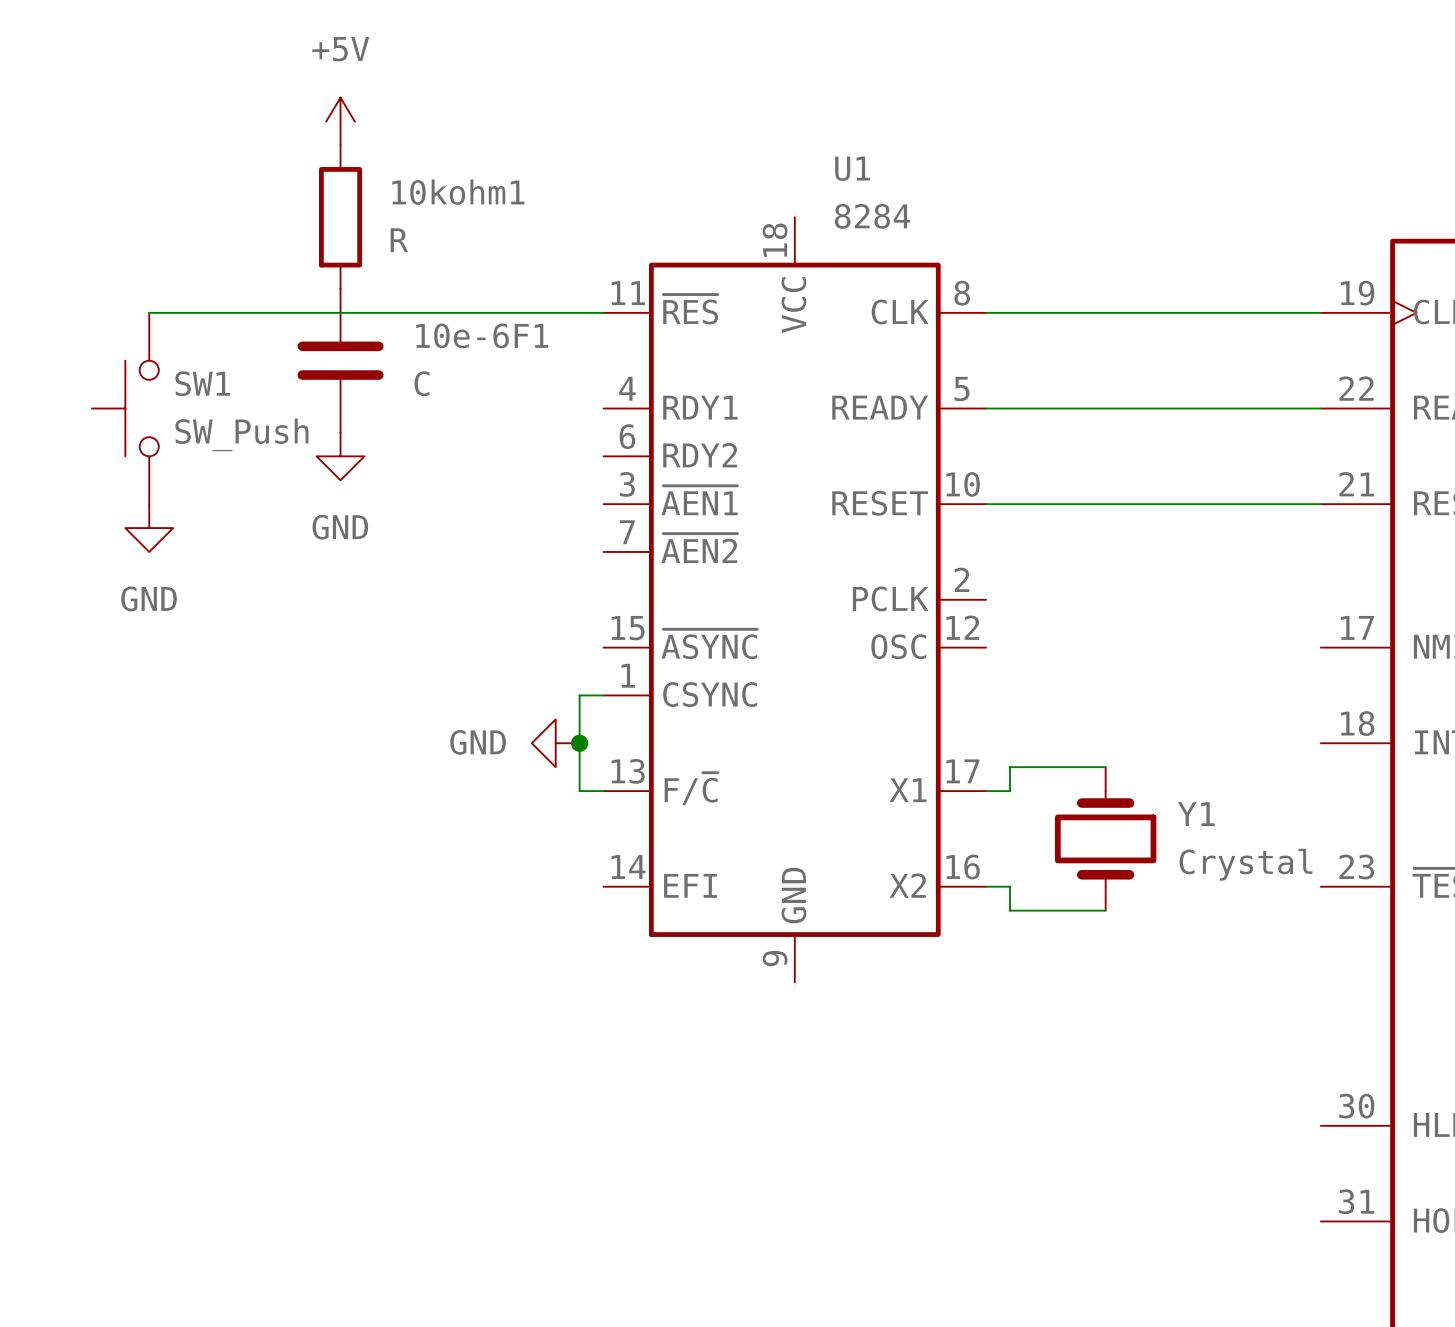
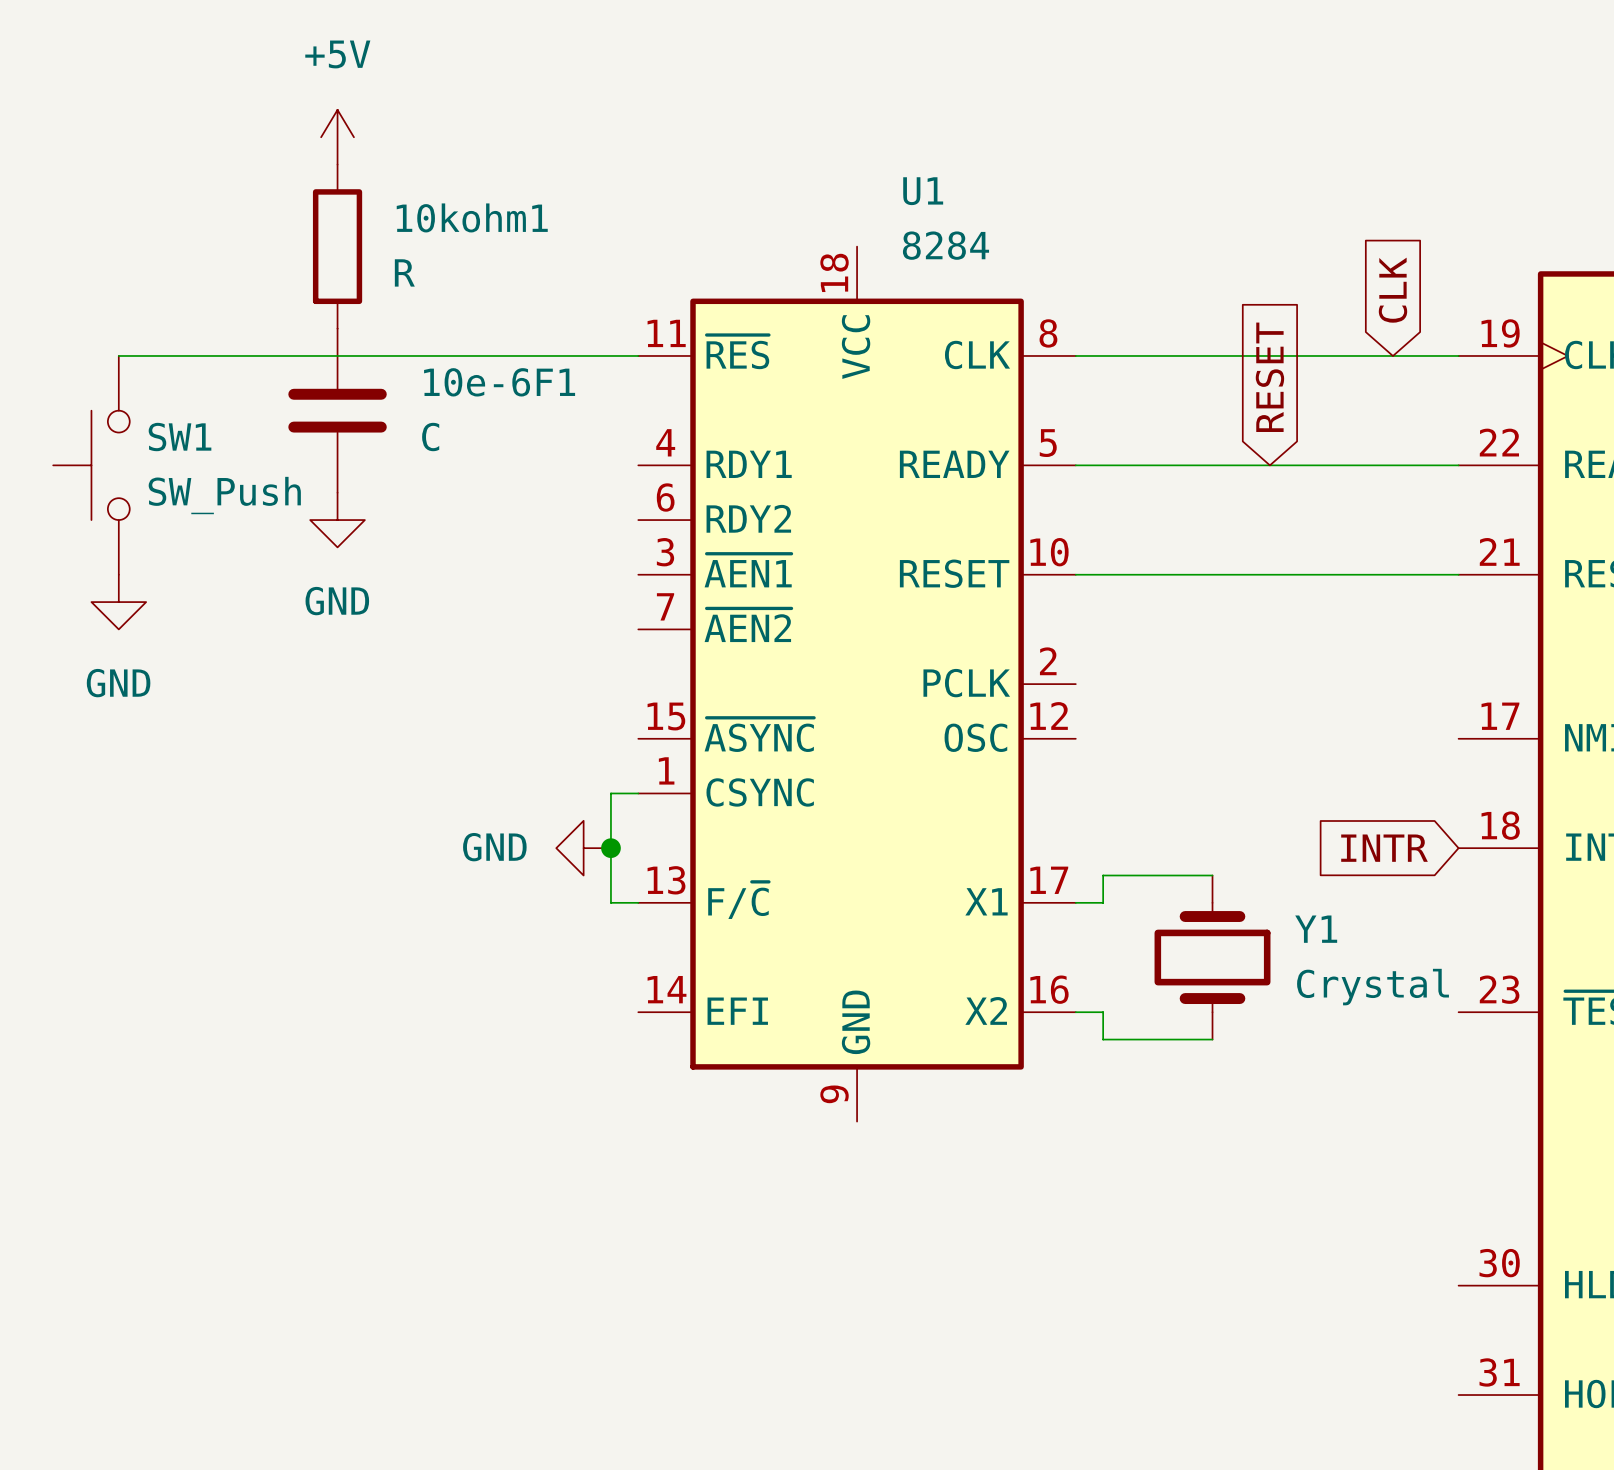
global label: none -> CLK (1392, 290)
global label: none -> RESET (1269, 377)
global label: none -> INTR (1384, 848)

